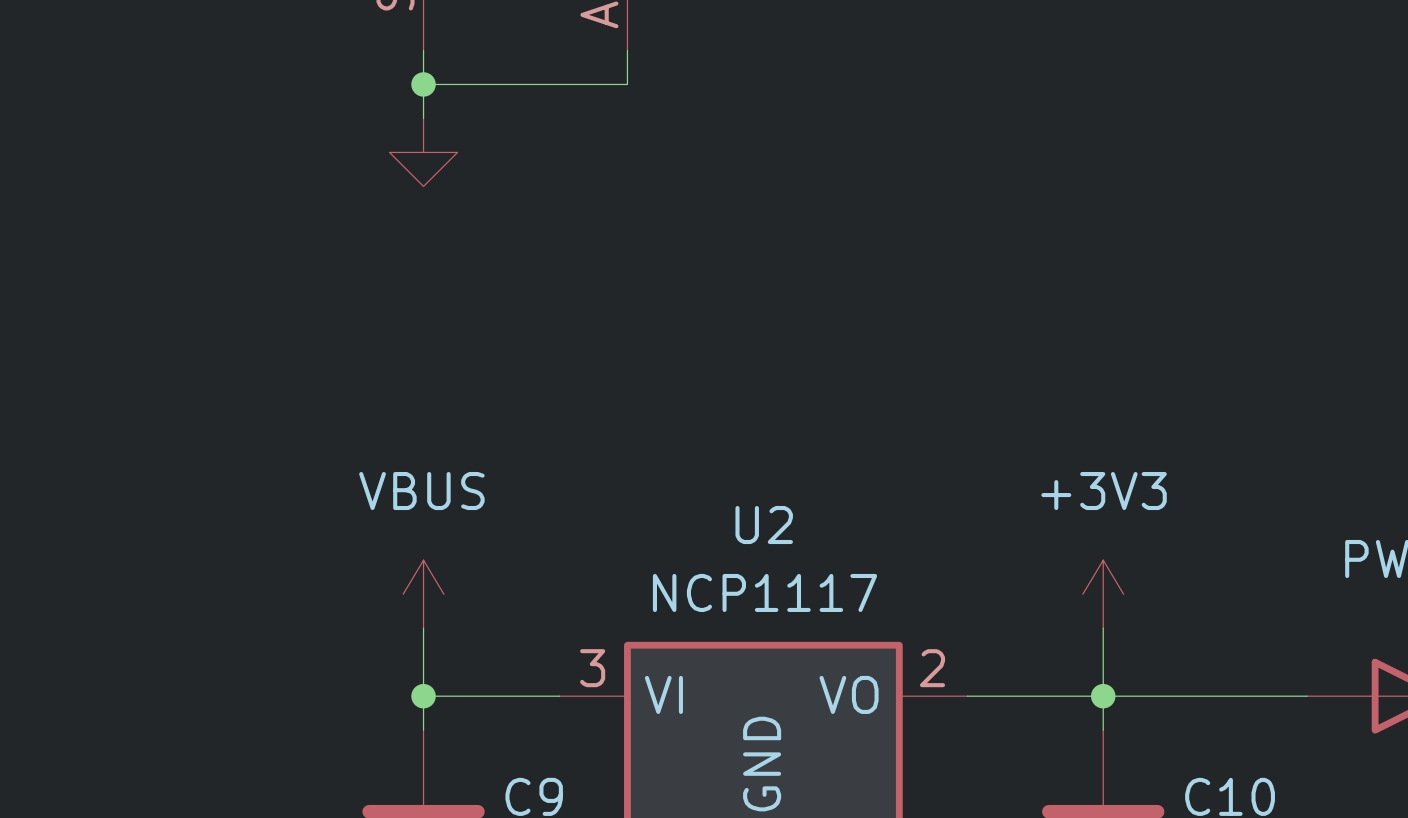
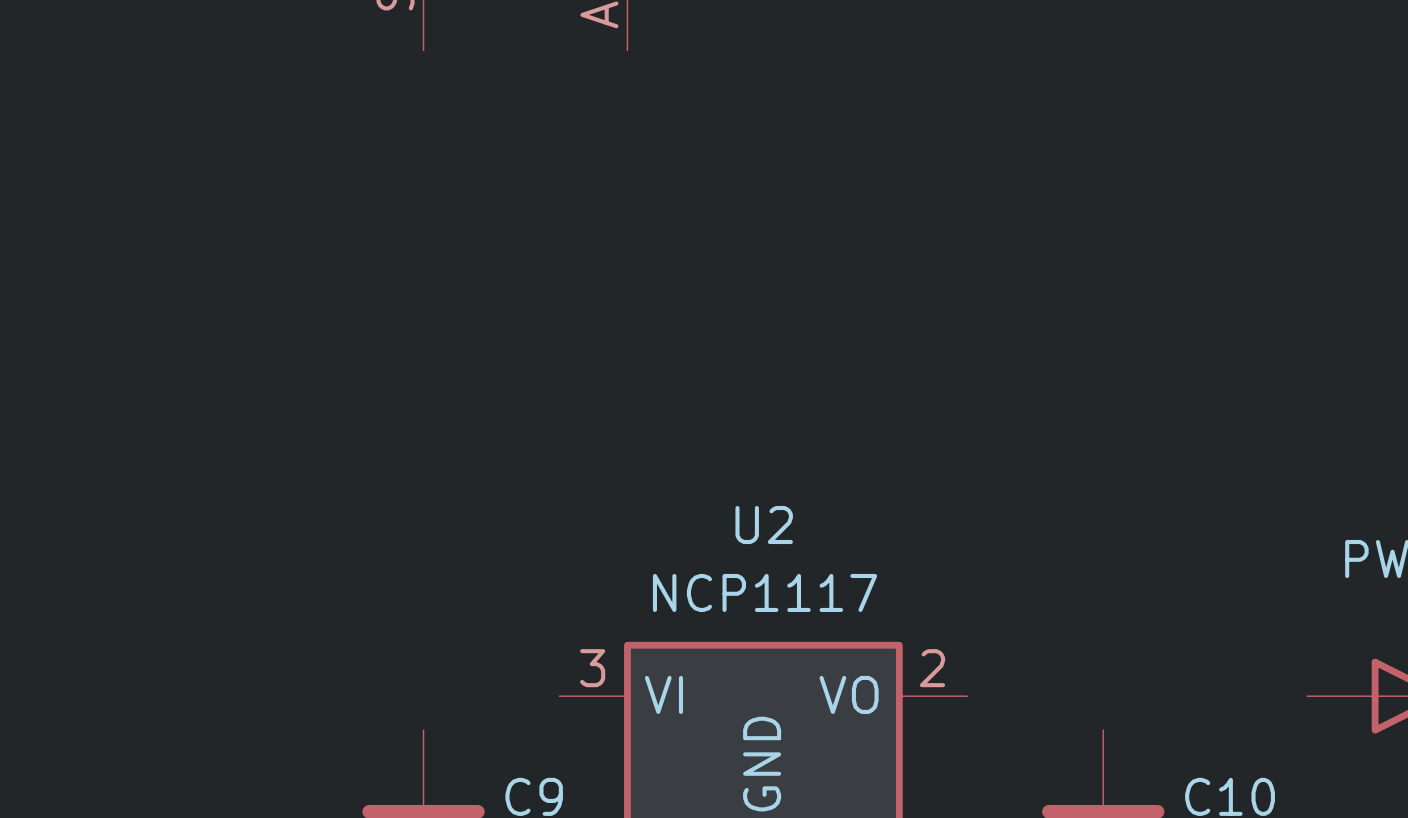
wire: (423, 50) (423, 118) -> none
wire: (627, 50) (627, 84) (423, 84) -> none
junction: (423, 84) -> none
power symbol: (423, 152) -> none
power symbol: VBUS (423, 594) -> none
power symbol: +3V3 (1103, 594) -> none
wire: (423, 628) (423, 730) -> none
wire: (1103, 628) (1103, 730) -> none
wire: (423, 696) (559, 696) -> none
junction: (423, 696) -> none
wire: (967, 696) (1307, 696) -> none
junction: (1103, 696) -> none

